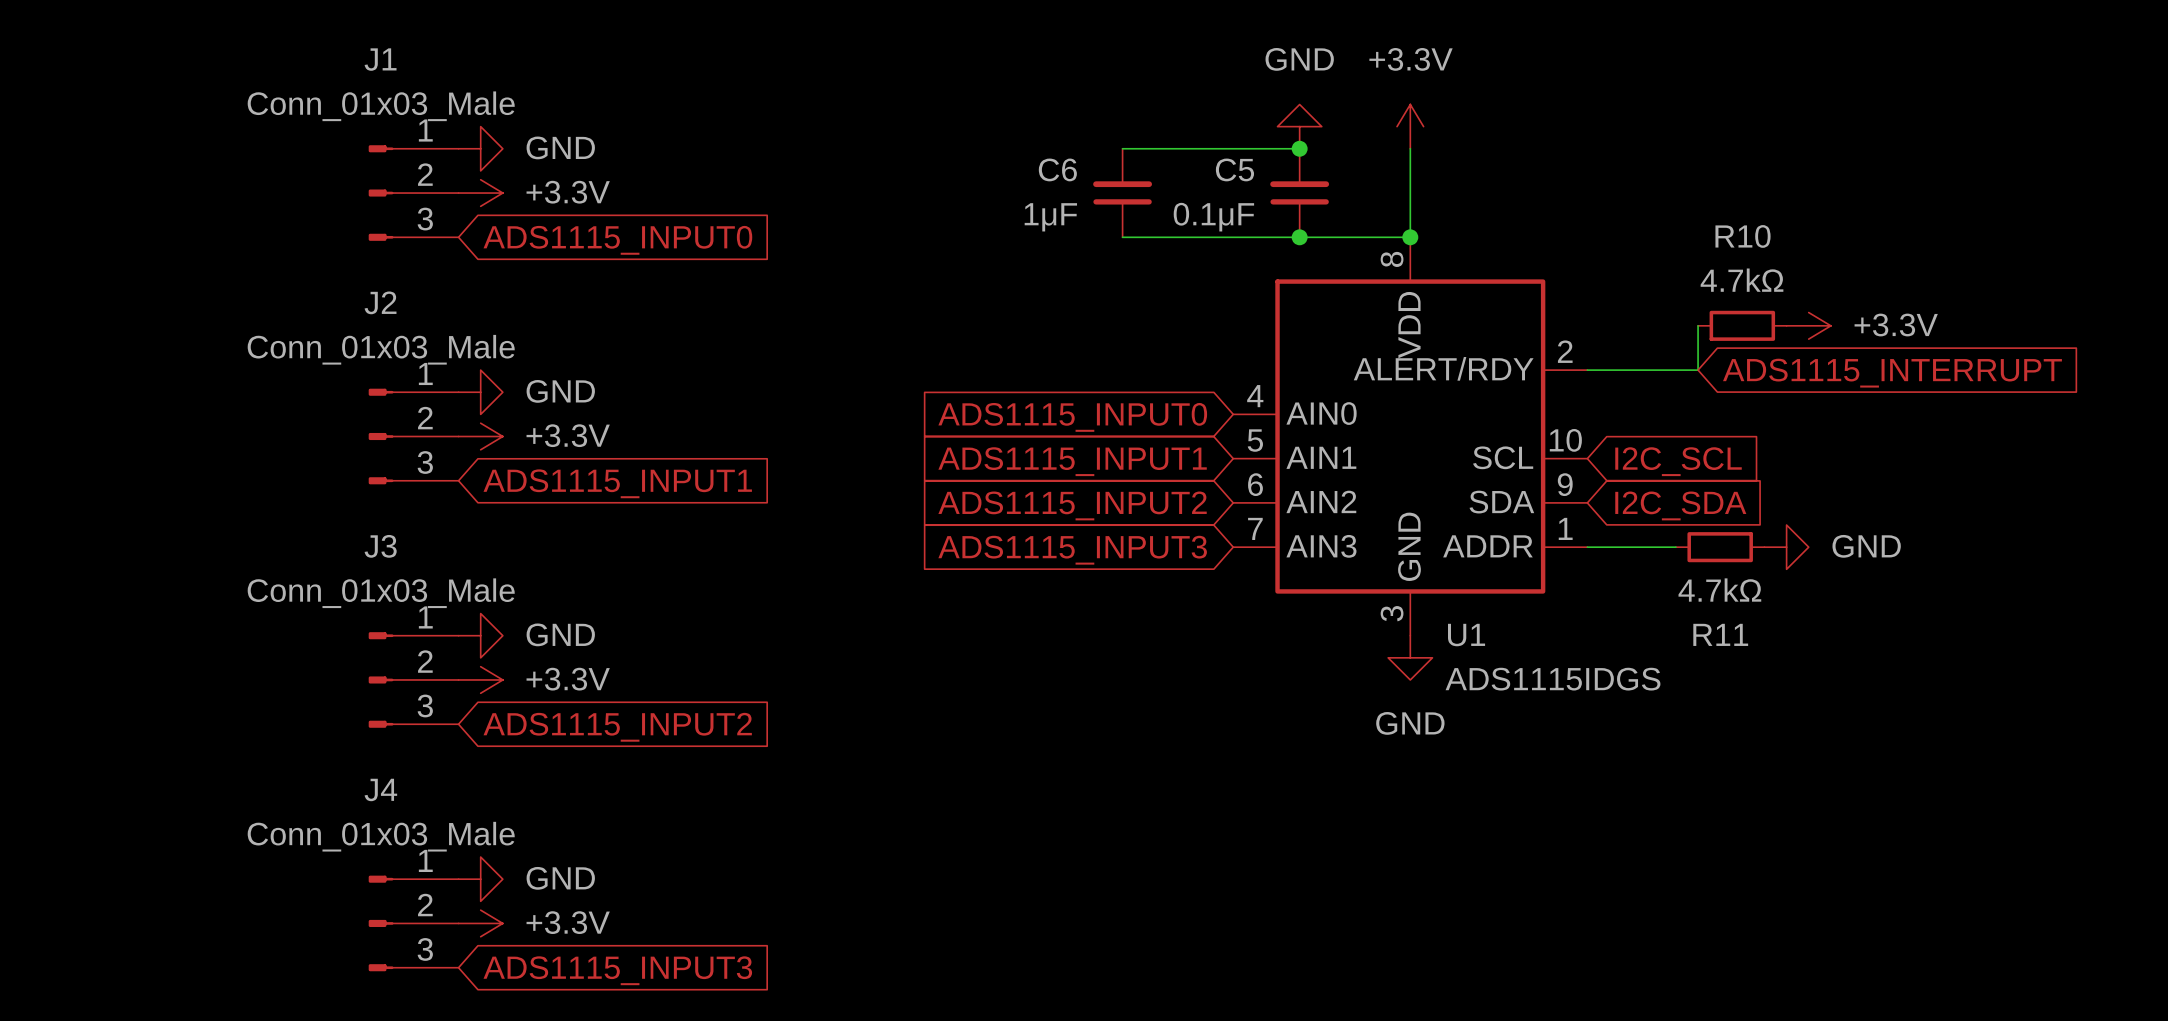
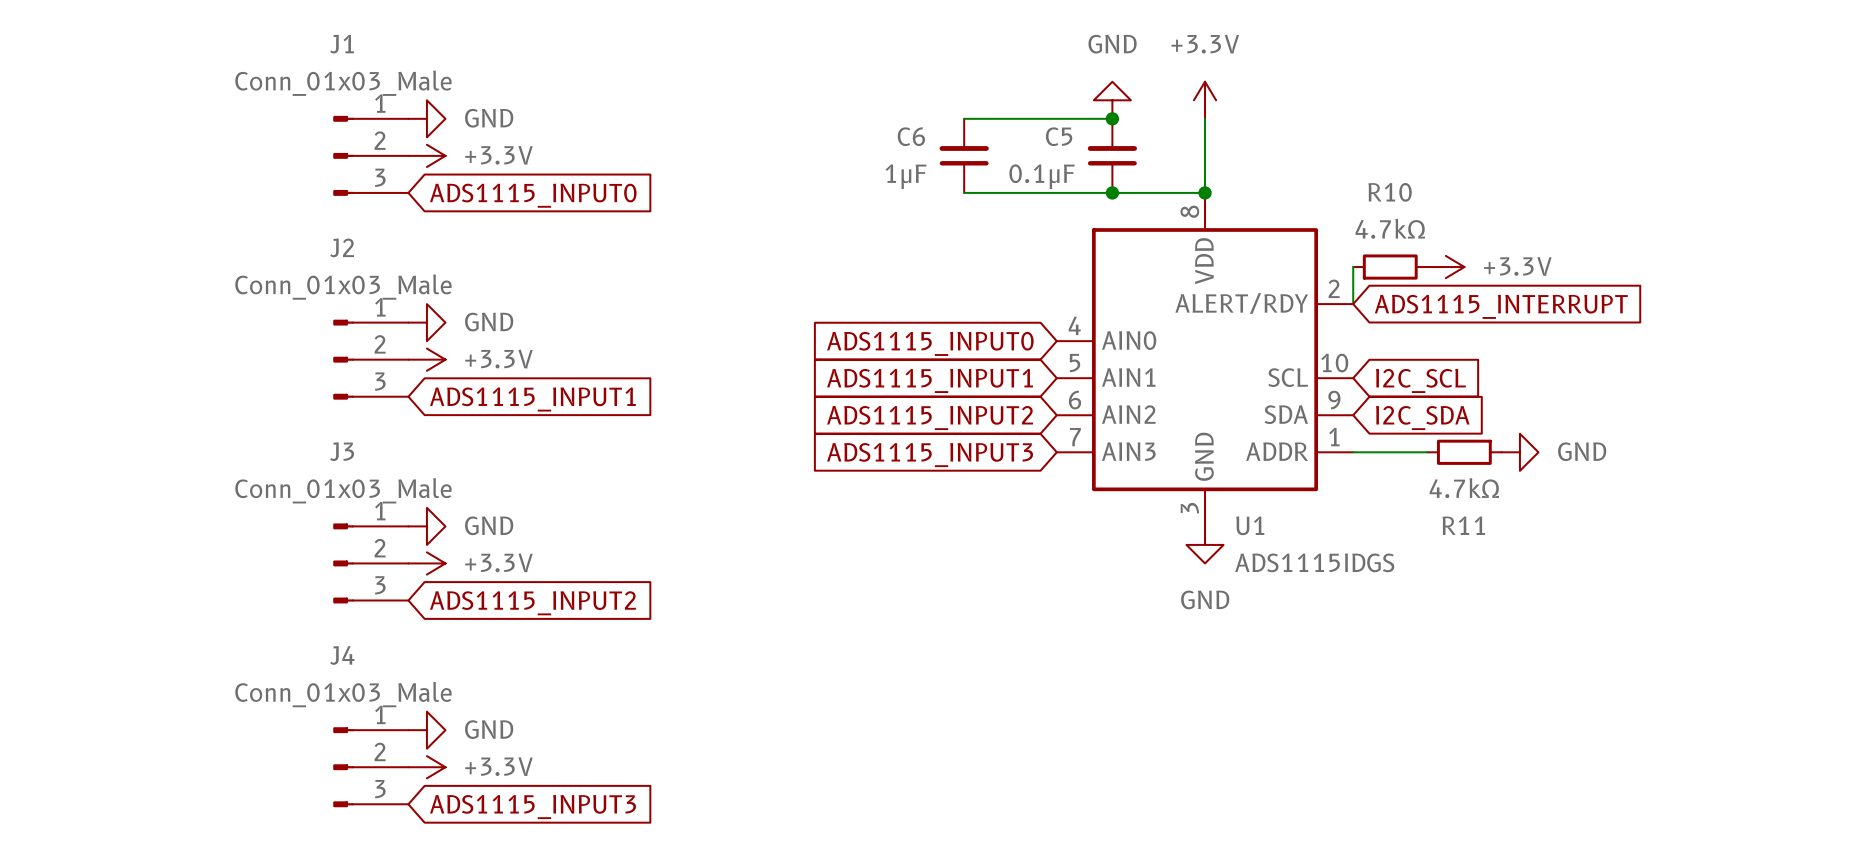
wire: (1698, 325) (1698, 370) (1587, 370) -> (1353, 267) (1353, 304)
R10 position: (1742, 325) -> (1390, 267)
power symbol position: +3.3V (1808, 325) -> +3.3V (1445, 267)
global label position: ADS1115_INTERRUPT (1892, 373) -> ADS1115_INTERRUPT (1501, 306)

